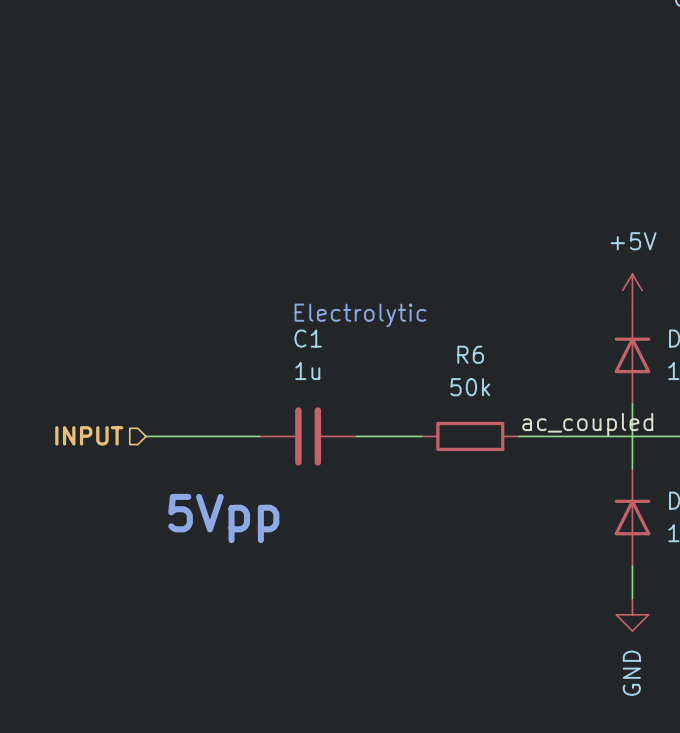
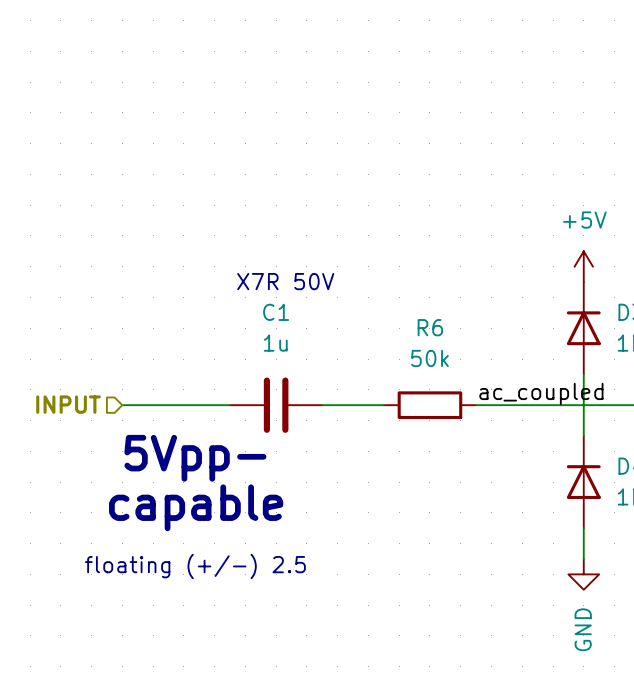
text: none -> X7R 50V (285, 281)
text: Electrolytic (360, 315) -> none
text: 5Vpp (223, 518) -> 5Vpp- (195, 458)
text: none -> capable (196, 507)
text: none -> floating (+/-) 2.5 (195, 566)

